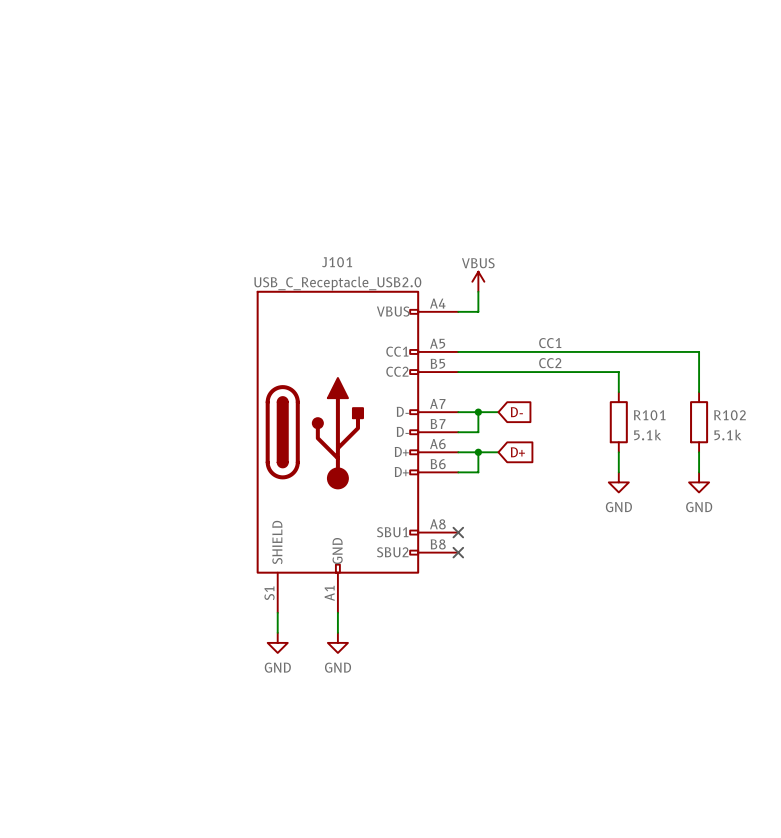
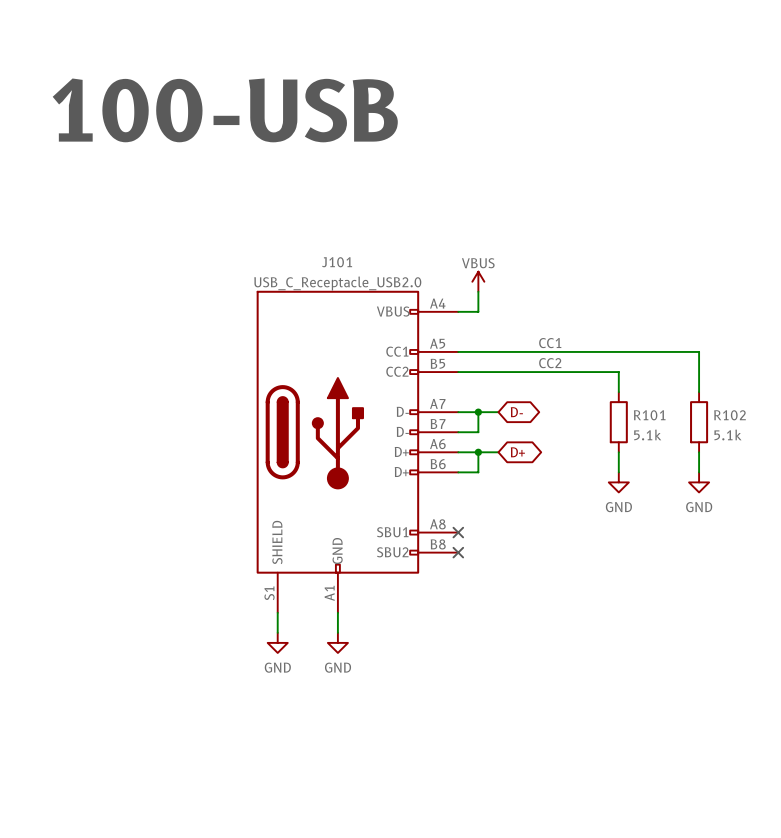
text: none -> 100-USB (225, 110)
global label shape: input (516, 412) -> bidirectional (516, 412)
global label shape: input (517, 452) -> bidirectional (517, 452)

